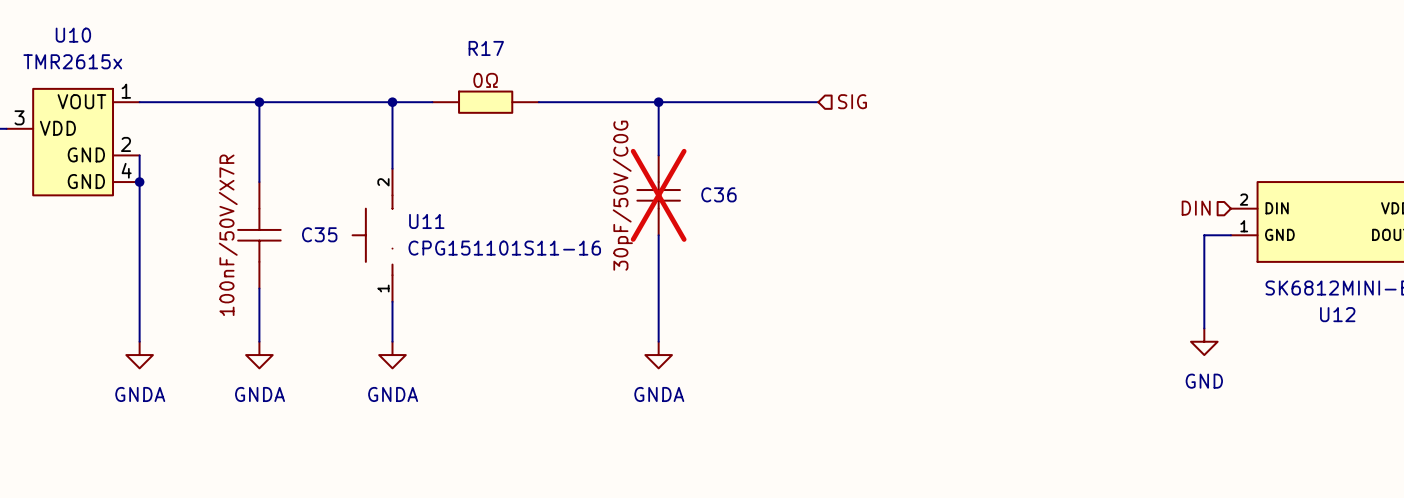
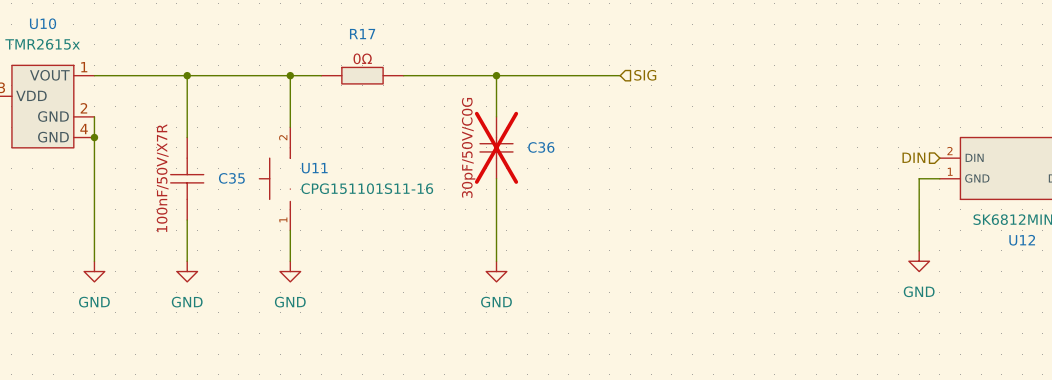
power symbol: GNDA (139, 355) -> GND (94, 271)
power symbol: GNDA (259, 355) -> GND (187, 271)
power symbol: GNDA (392, 355) -> GND (290, 271)
power symbol: GNDA (658, 355) -> GND (496, 271)

